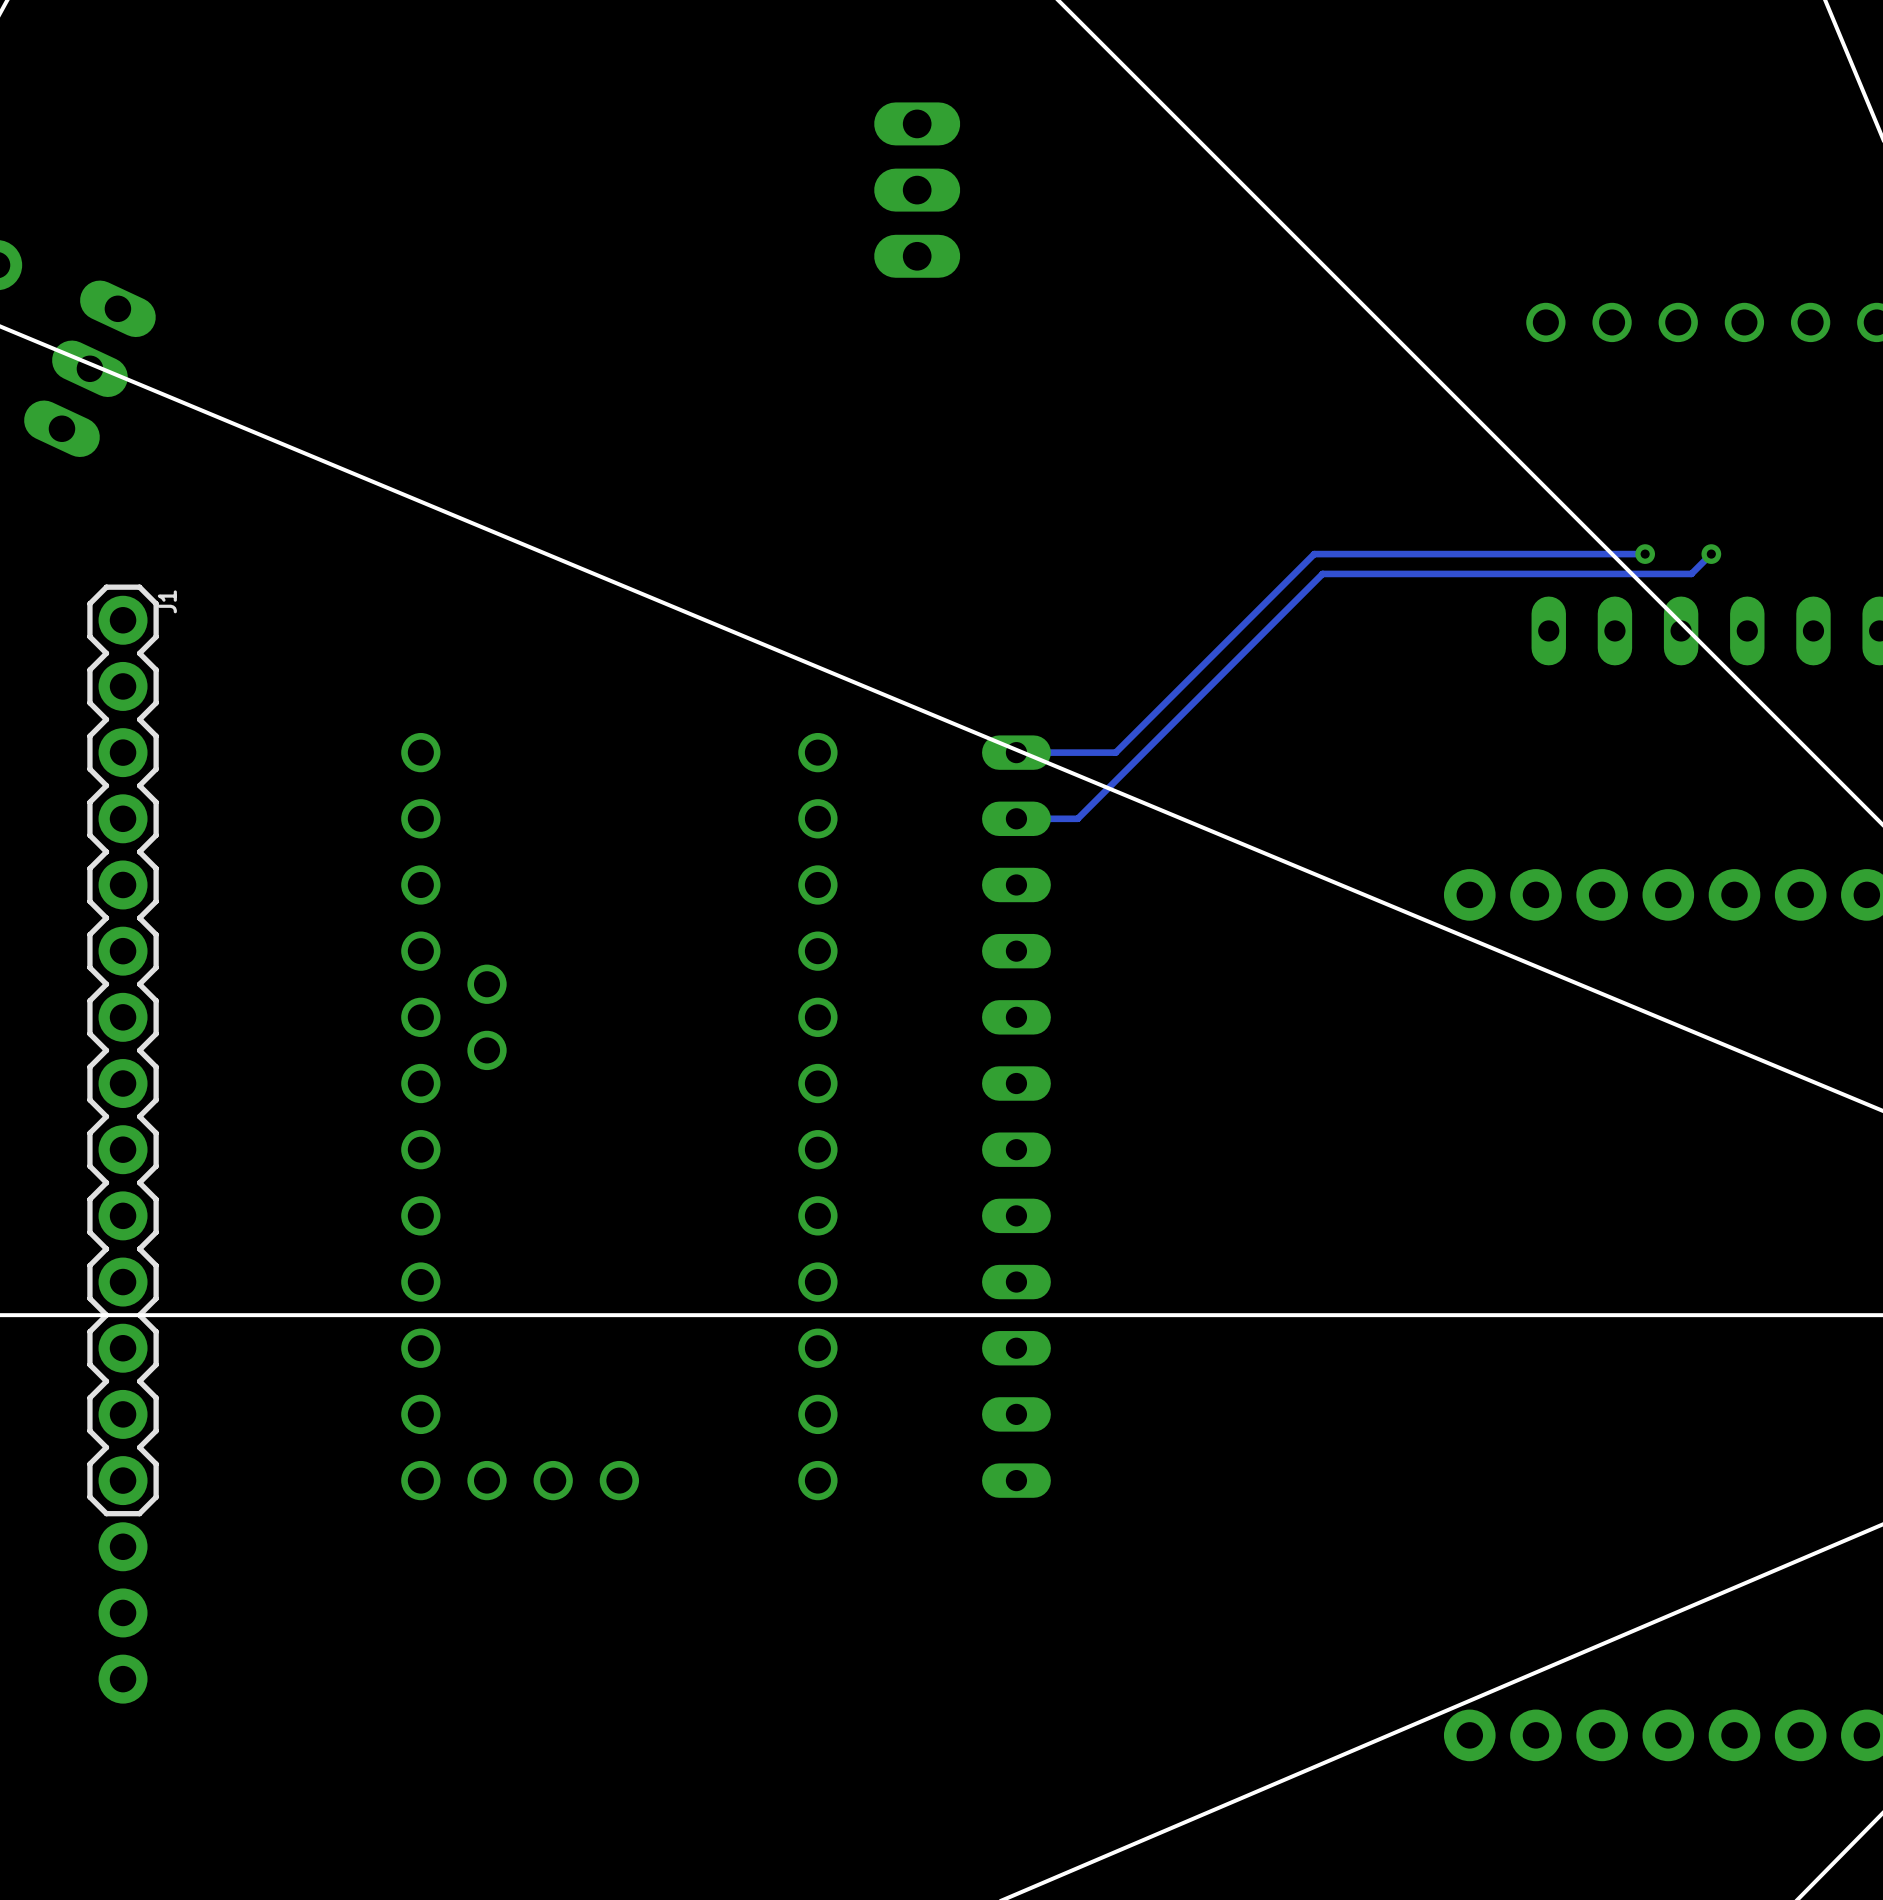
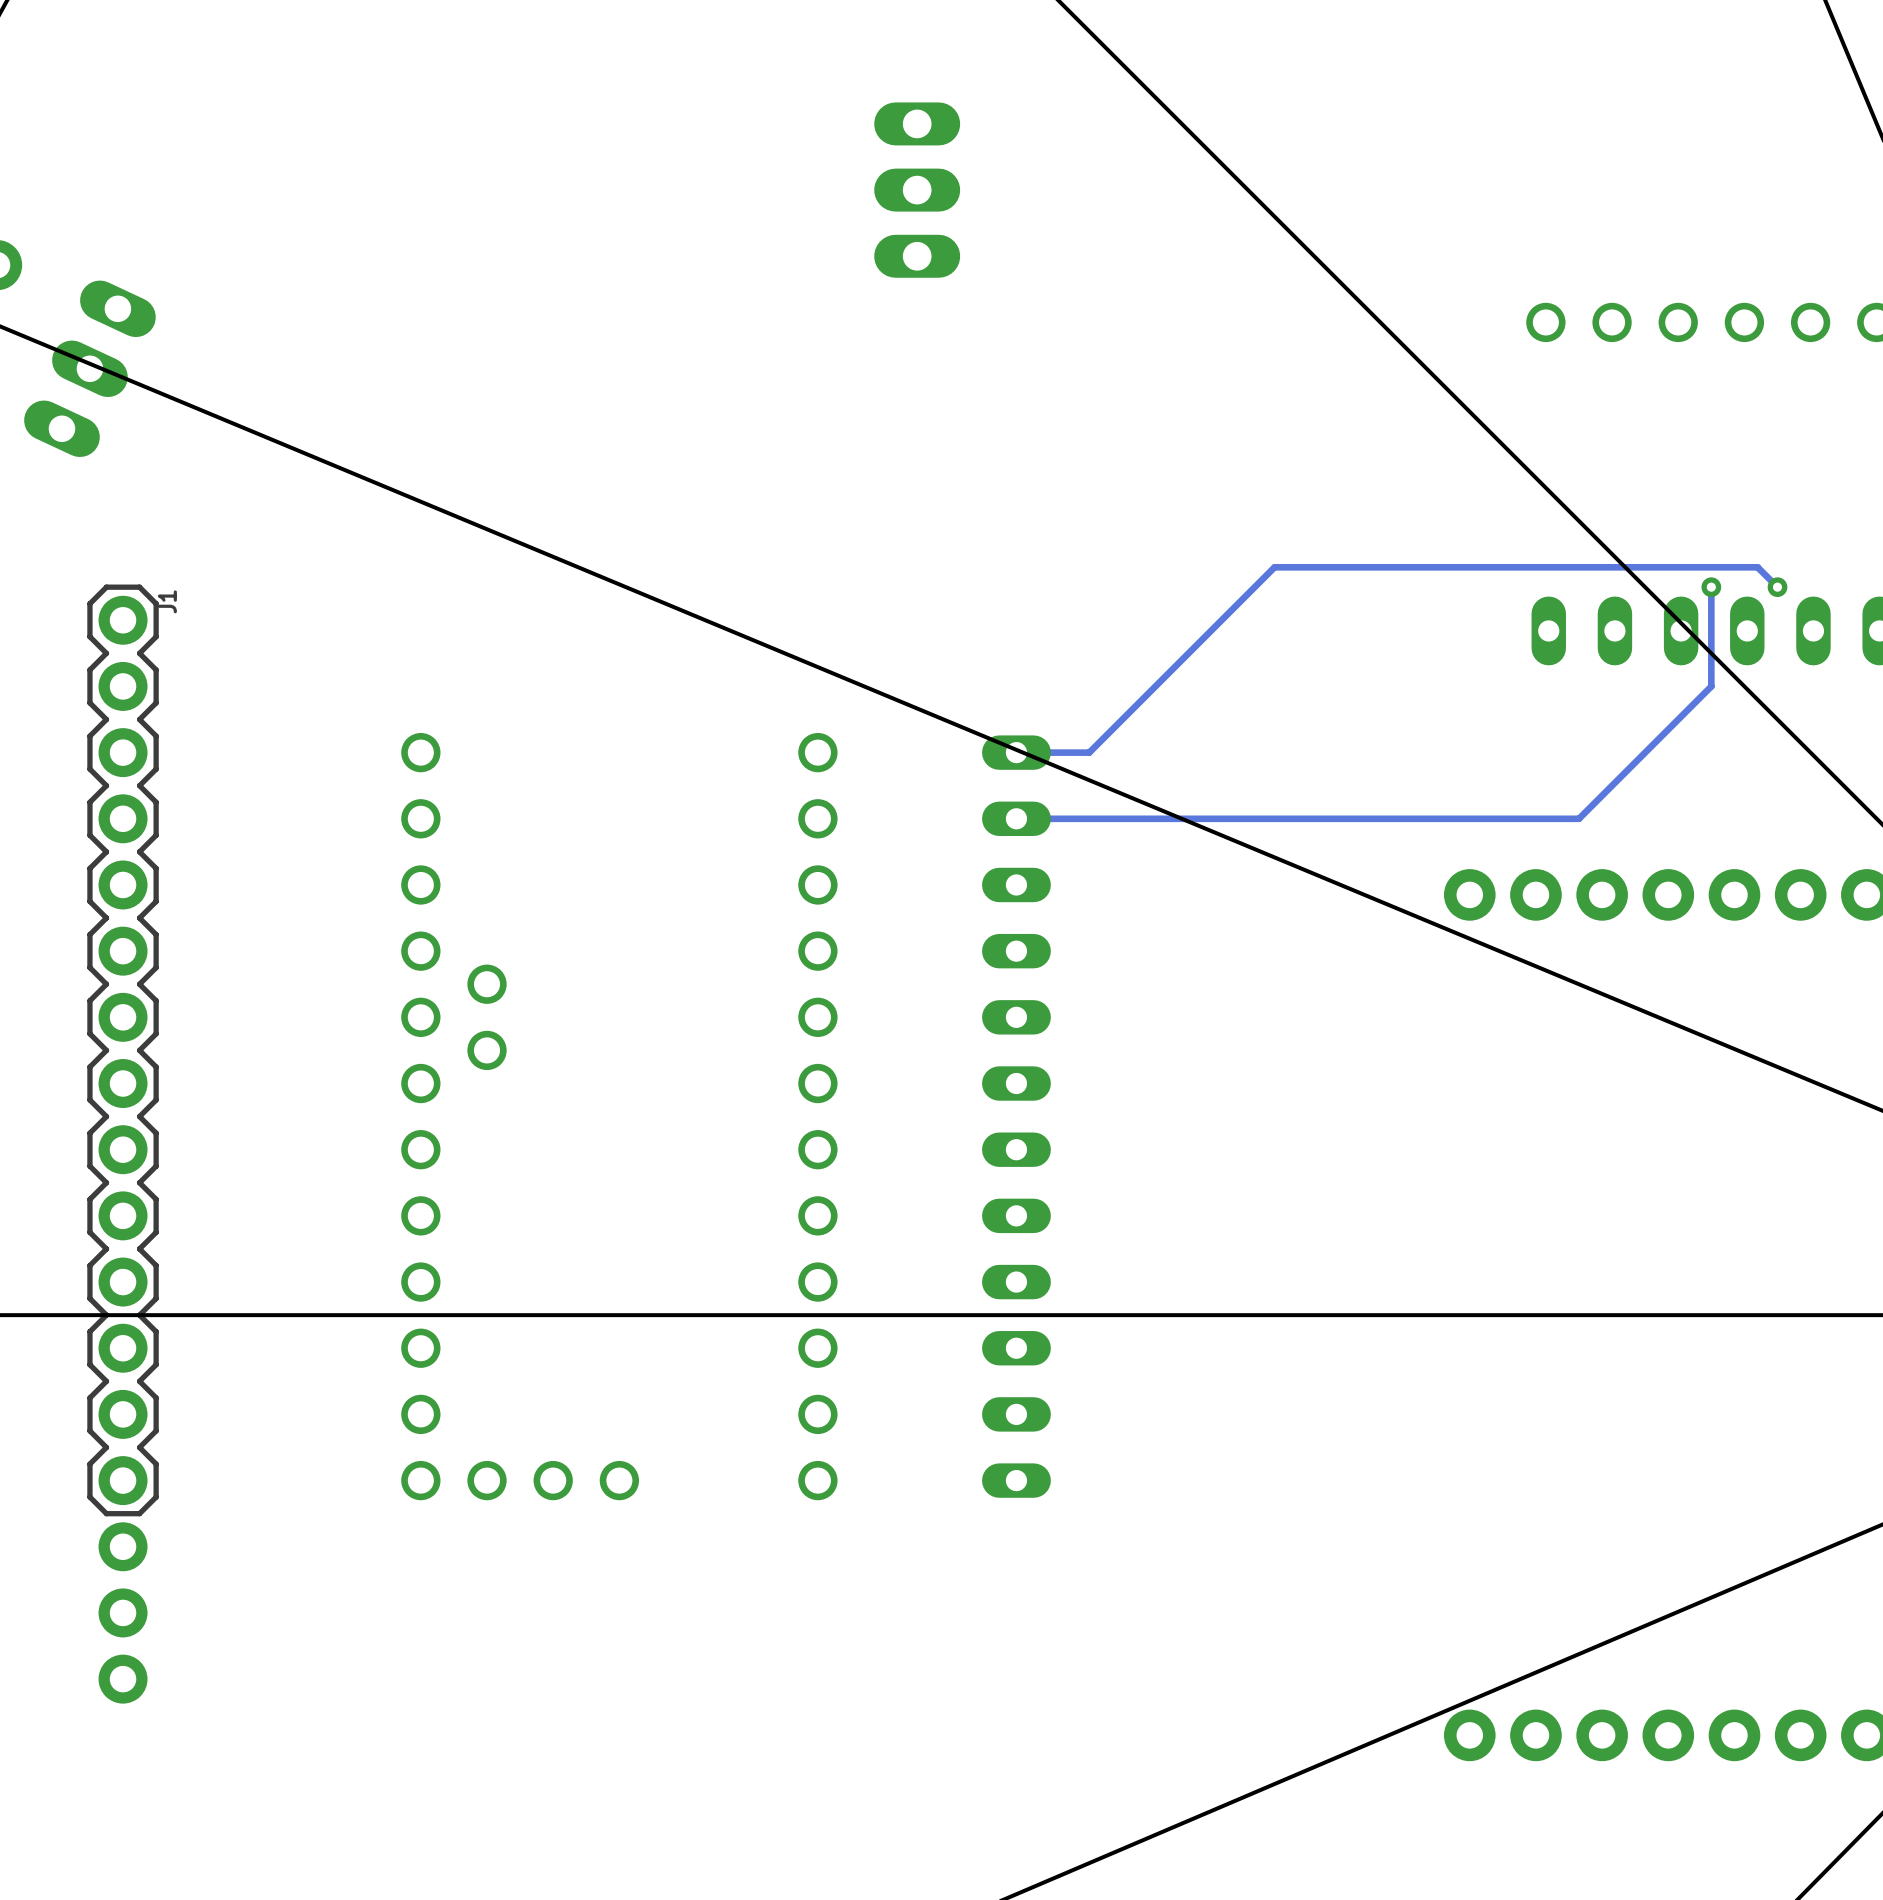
track: (1645, 554) (1314, 554) (1115, 752) (1089, 752) -> (1777, 587) (1757, 567) (1274, 567) (1089, 752)
via: (1645, 554) -> none
track: (1711, 554) (1691, 573) (1322, 573) (1077, 818) -> (1711, 587) (1711, 686) (1578, 818) (1077, 818)
via position: (1711, 554) -> (1711, 587)
via: none -> (1777, 587)

